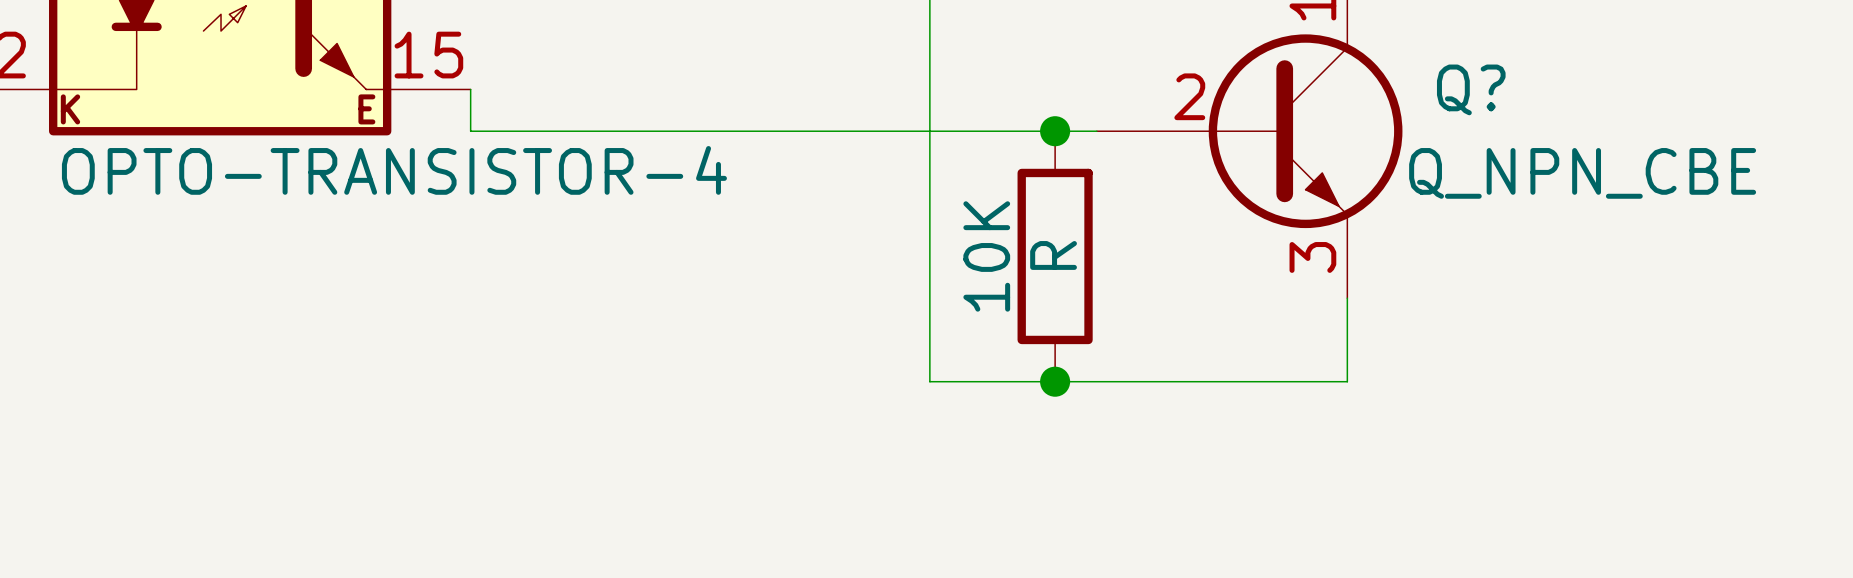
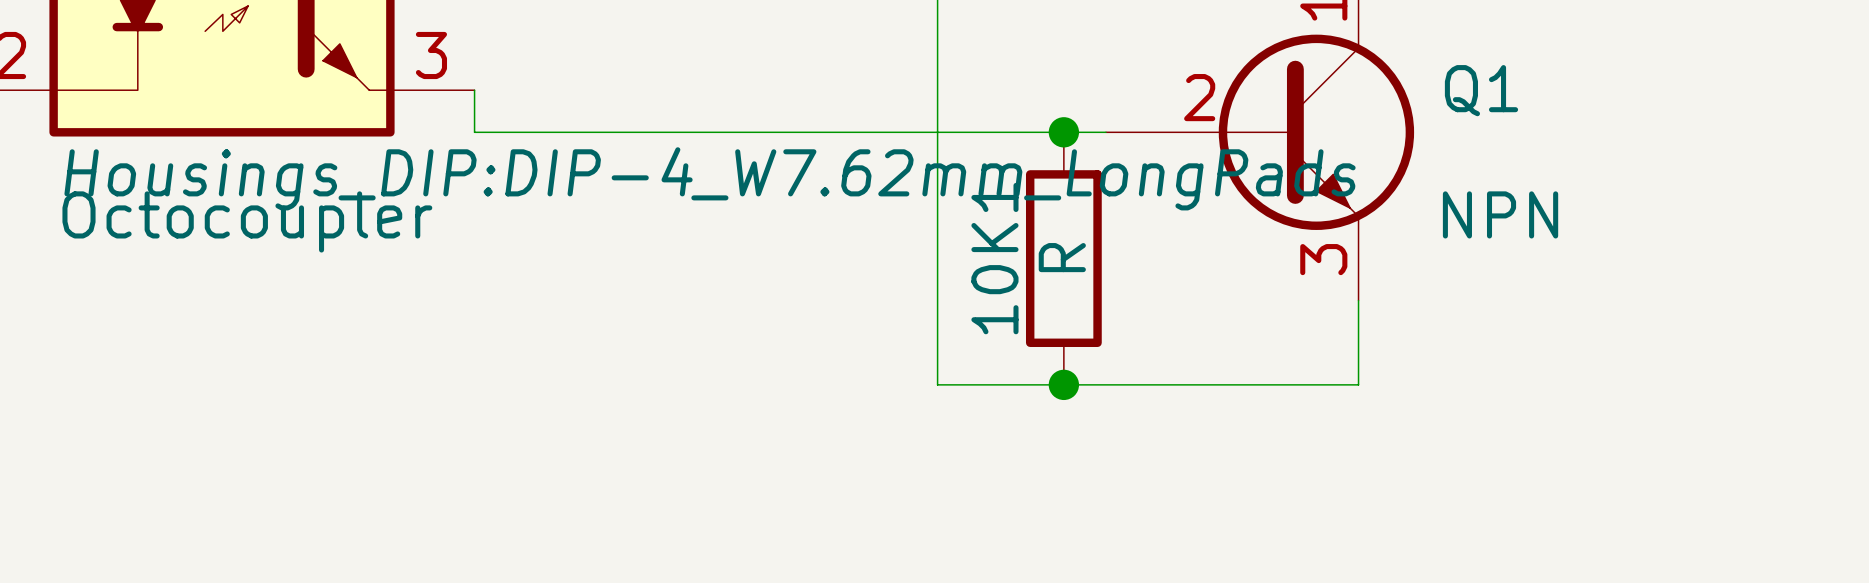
part pin number: 15 (428, 55) -> 3 (431, 55)
Q? name: Q? (1471, 89) -> Q1 (1481, 90)
part text: K (70, 109) -> none
part text: E (366, 109) -> none
part value: OPTO-TRANSISTOR-4 (394, 170) -> Octocoupler (247, 221)
Q? value: Q_NPN_CBE (1582, 173) -> NPN (1500, 214)
part text: none -> Housings_DIP:DIP-4_W7.62mm_LongPads (710, 178)
10K name: 10K (986, 256) -> 10K1 (994, 258)

